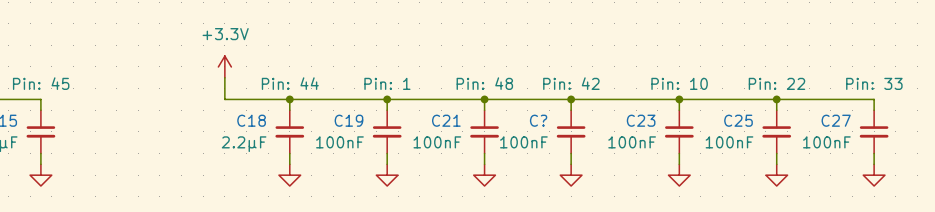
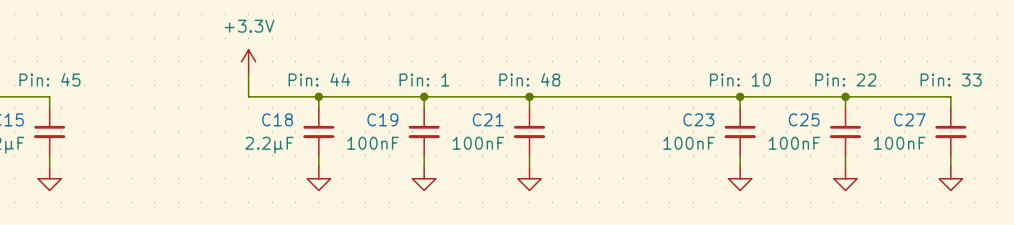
wire: (571, 99) (571, 110) -> none
junction: (571, 99) -> none
C?: 100nF (571, 131) -> none
wire: (571, 153) (571, 164) -> none
power symbol: (571, 175) -> none

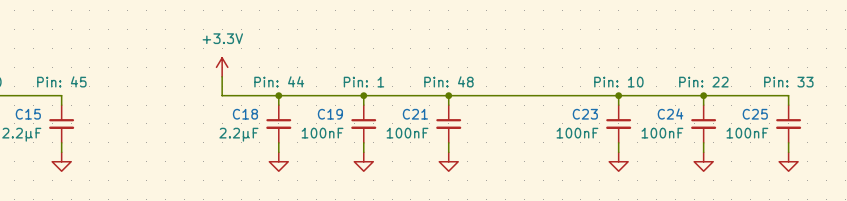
C25 name: C25 (804, 119) -> C24 (670, 114)
C27 name: C27 (909, 119) -> C25 (755, 114)

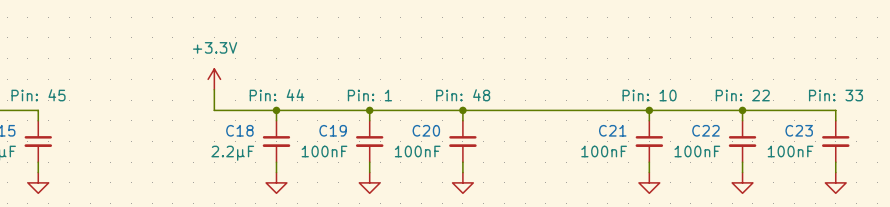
C21 name: C21 (415, 114) -> C20 (426, 130)
C23 name: C23 (585, 114) -> C21 (612, 130)
C24 name: C24 (670, 114) -> C22 (705, 130)
C25 name: C25 (755, 114) -> C23 (799, 130)

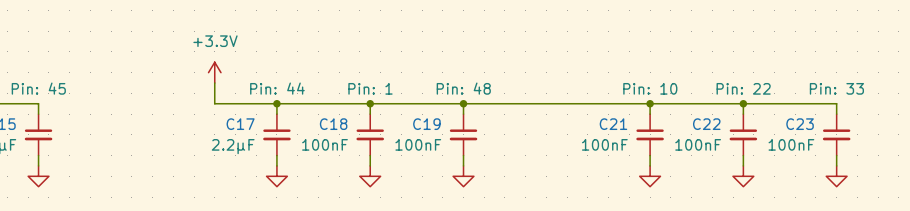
C18 name: C18 (239, 130) -> C17 (240, 124)
C19 name: C19 (333, 130) -> C18 (333, 124)
C20 name: C20 (426, 130) -> C19 (426, 124)

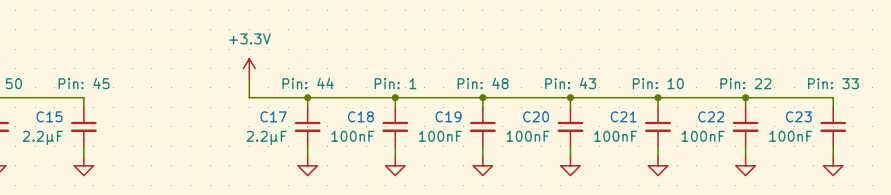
wire: none -> (570, 97) (570, 107)
junction: none -> (570, 97)
C20: none -> 100nF (570, 126)
wire: none -> (570, 146) (570, 156)
power symbol: none -> (570, 165)

